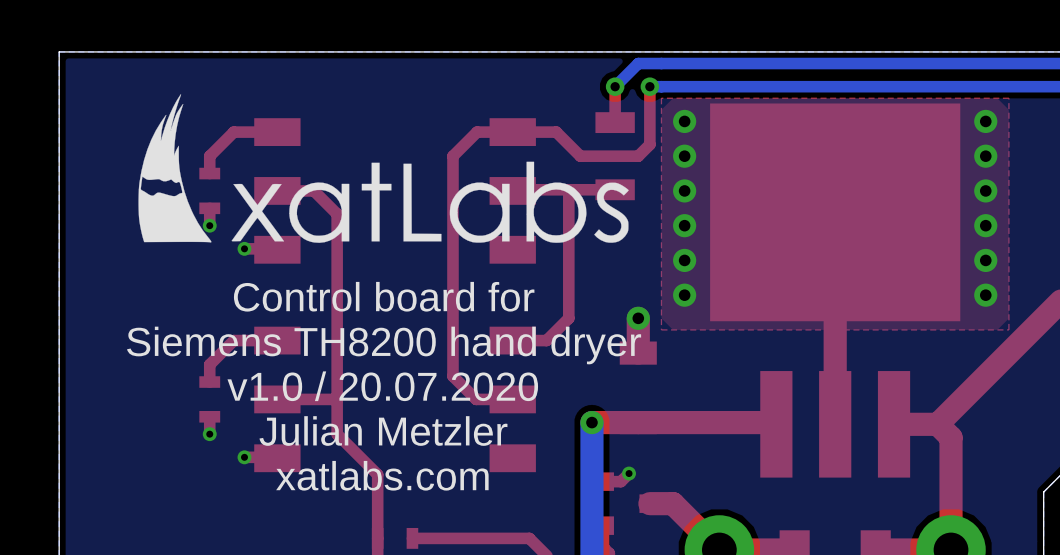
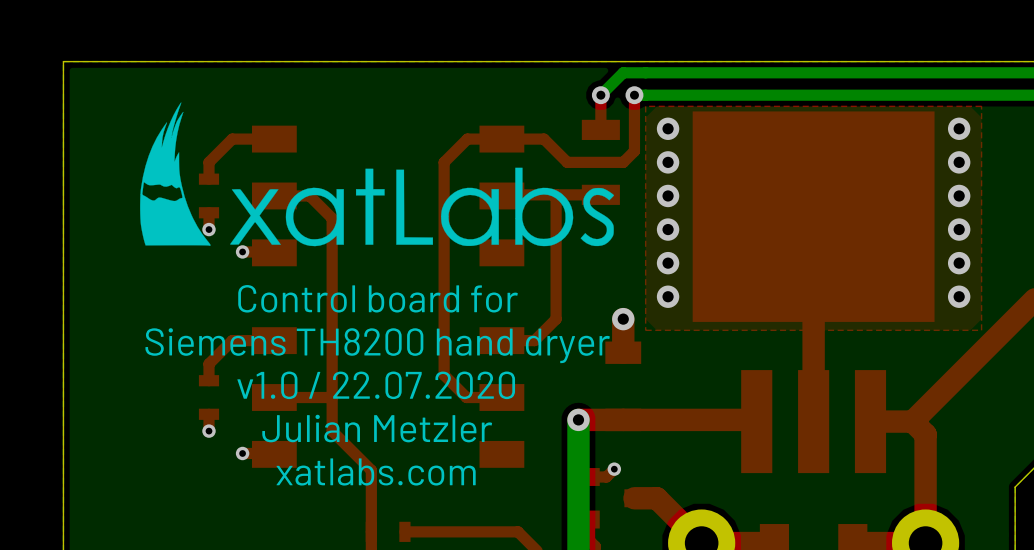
text: v1.0 / 20.07.2020 (382, 386) -> v1.0 / 22.07.2020 (376, 385)

